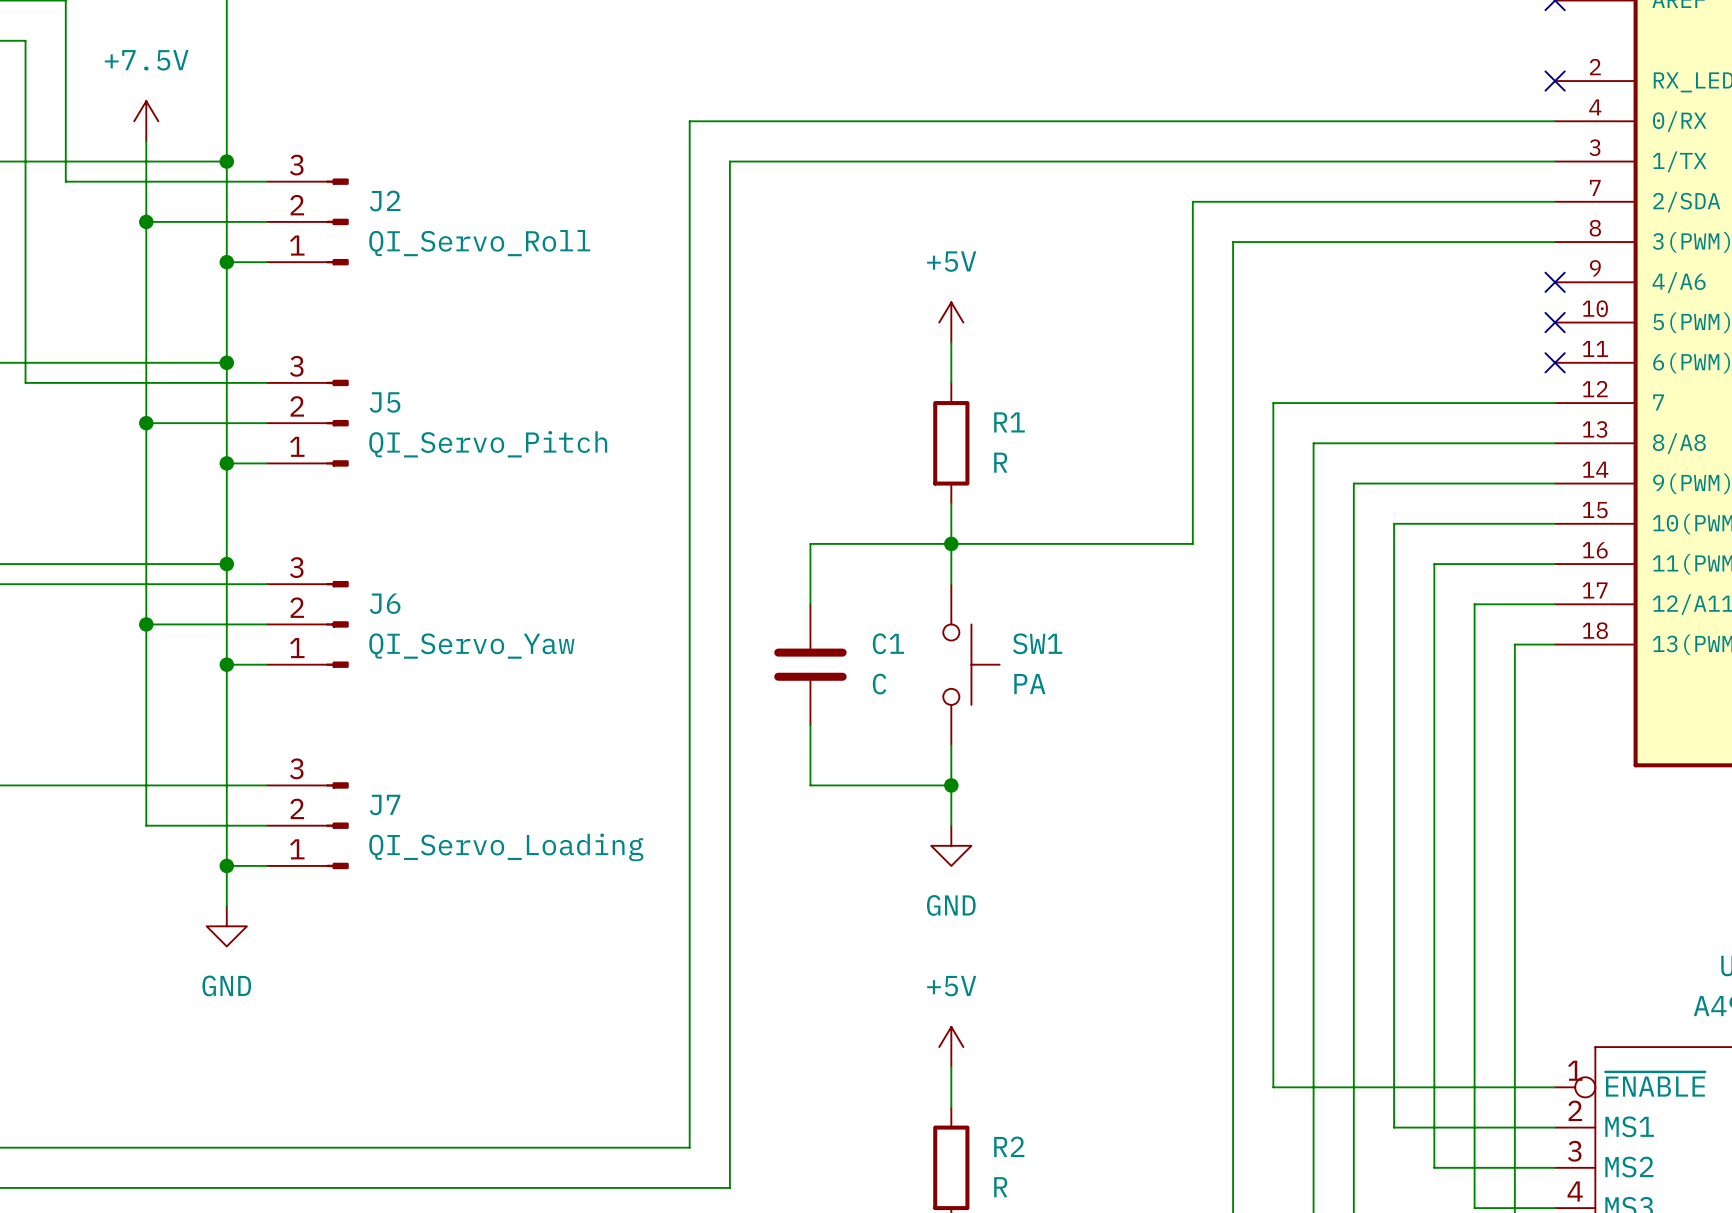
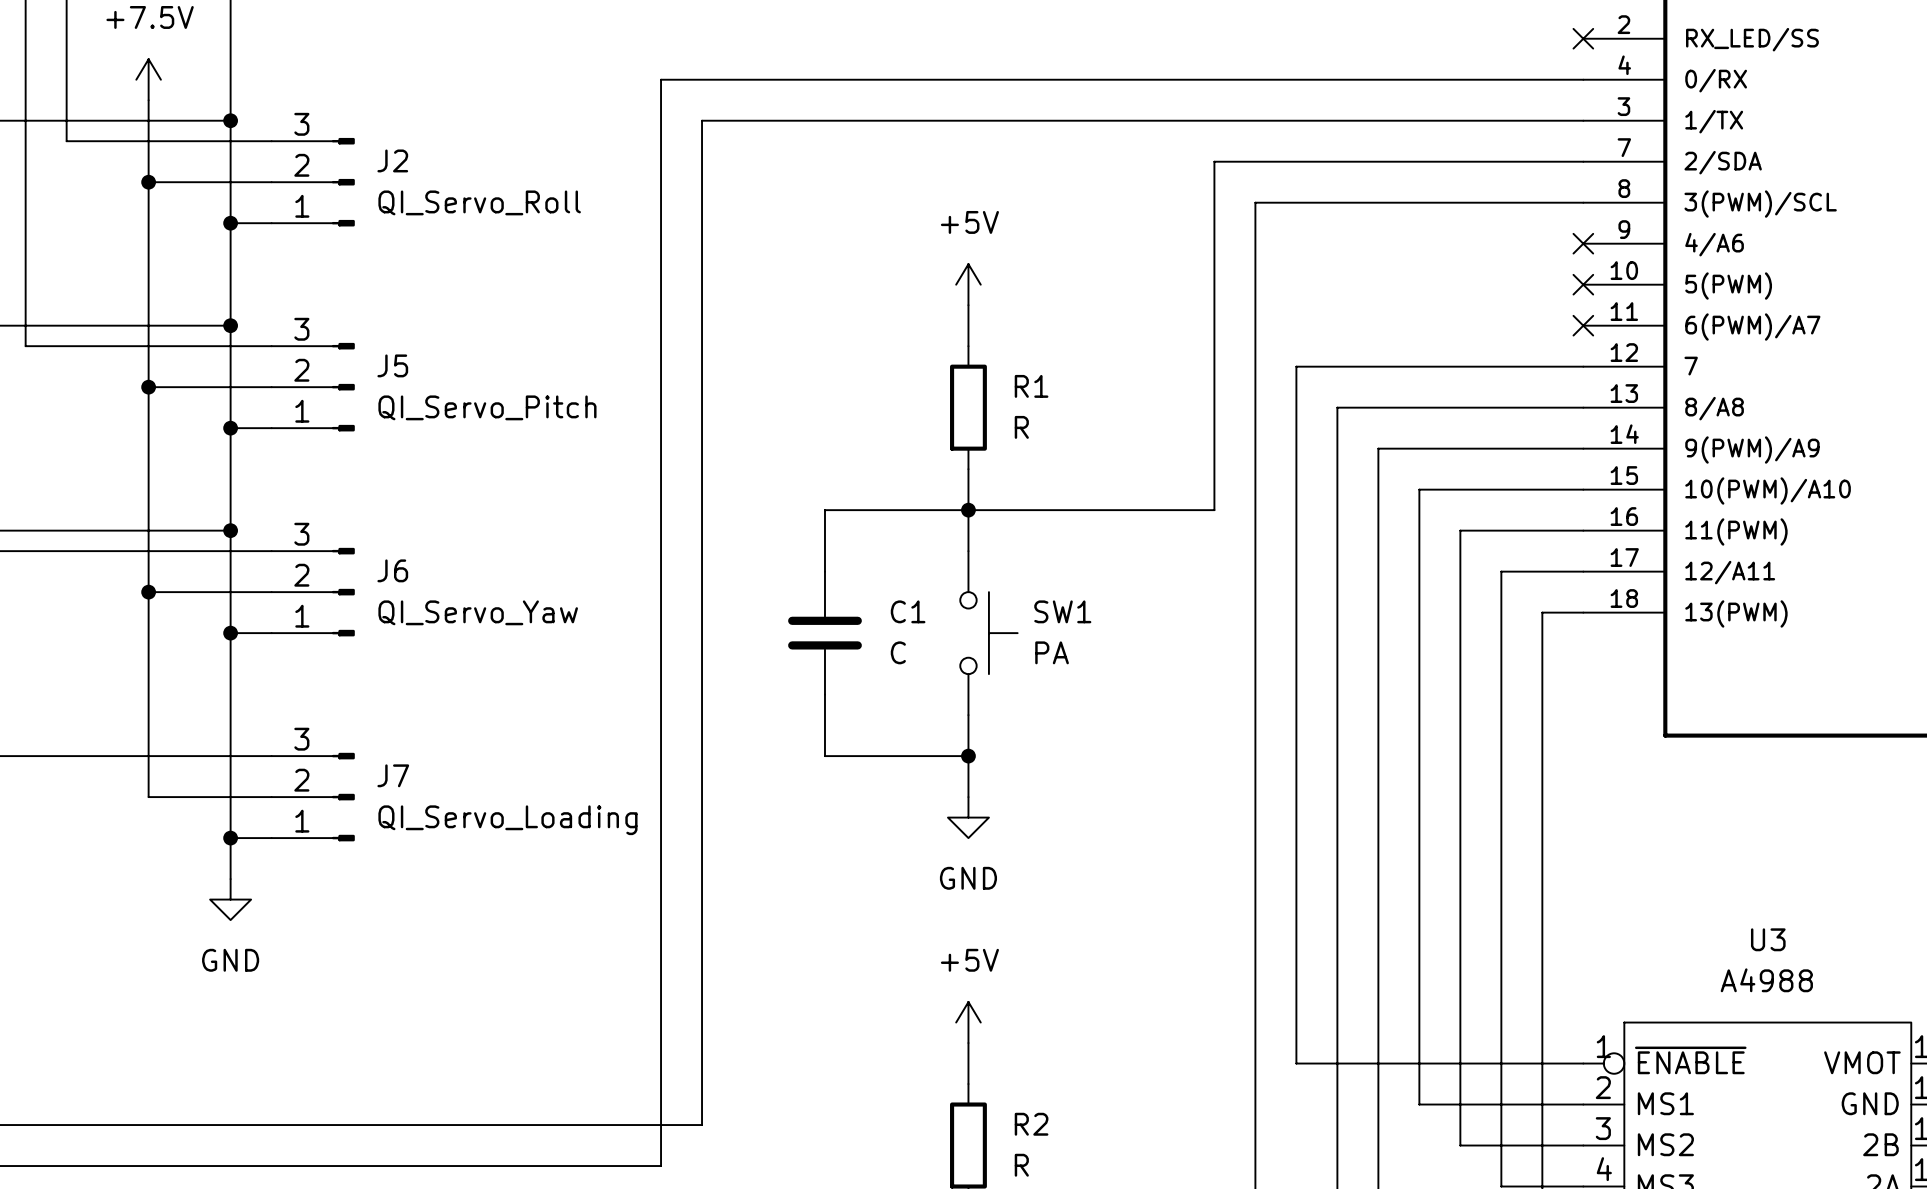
wire: (689, 121) (689, 161) -> (743, 120) (702, 120)
wire: (729, 161) (729, 1187) (649, 1187) -> (702, 79) (661, 79) (661, 1166)

